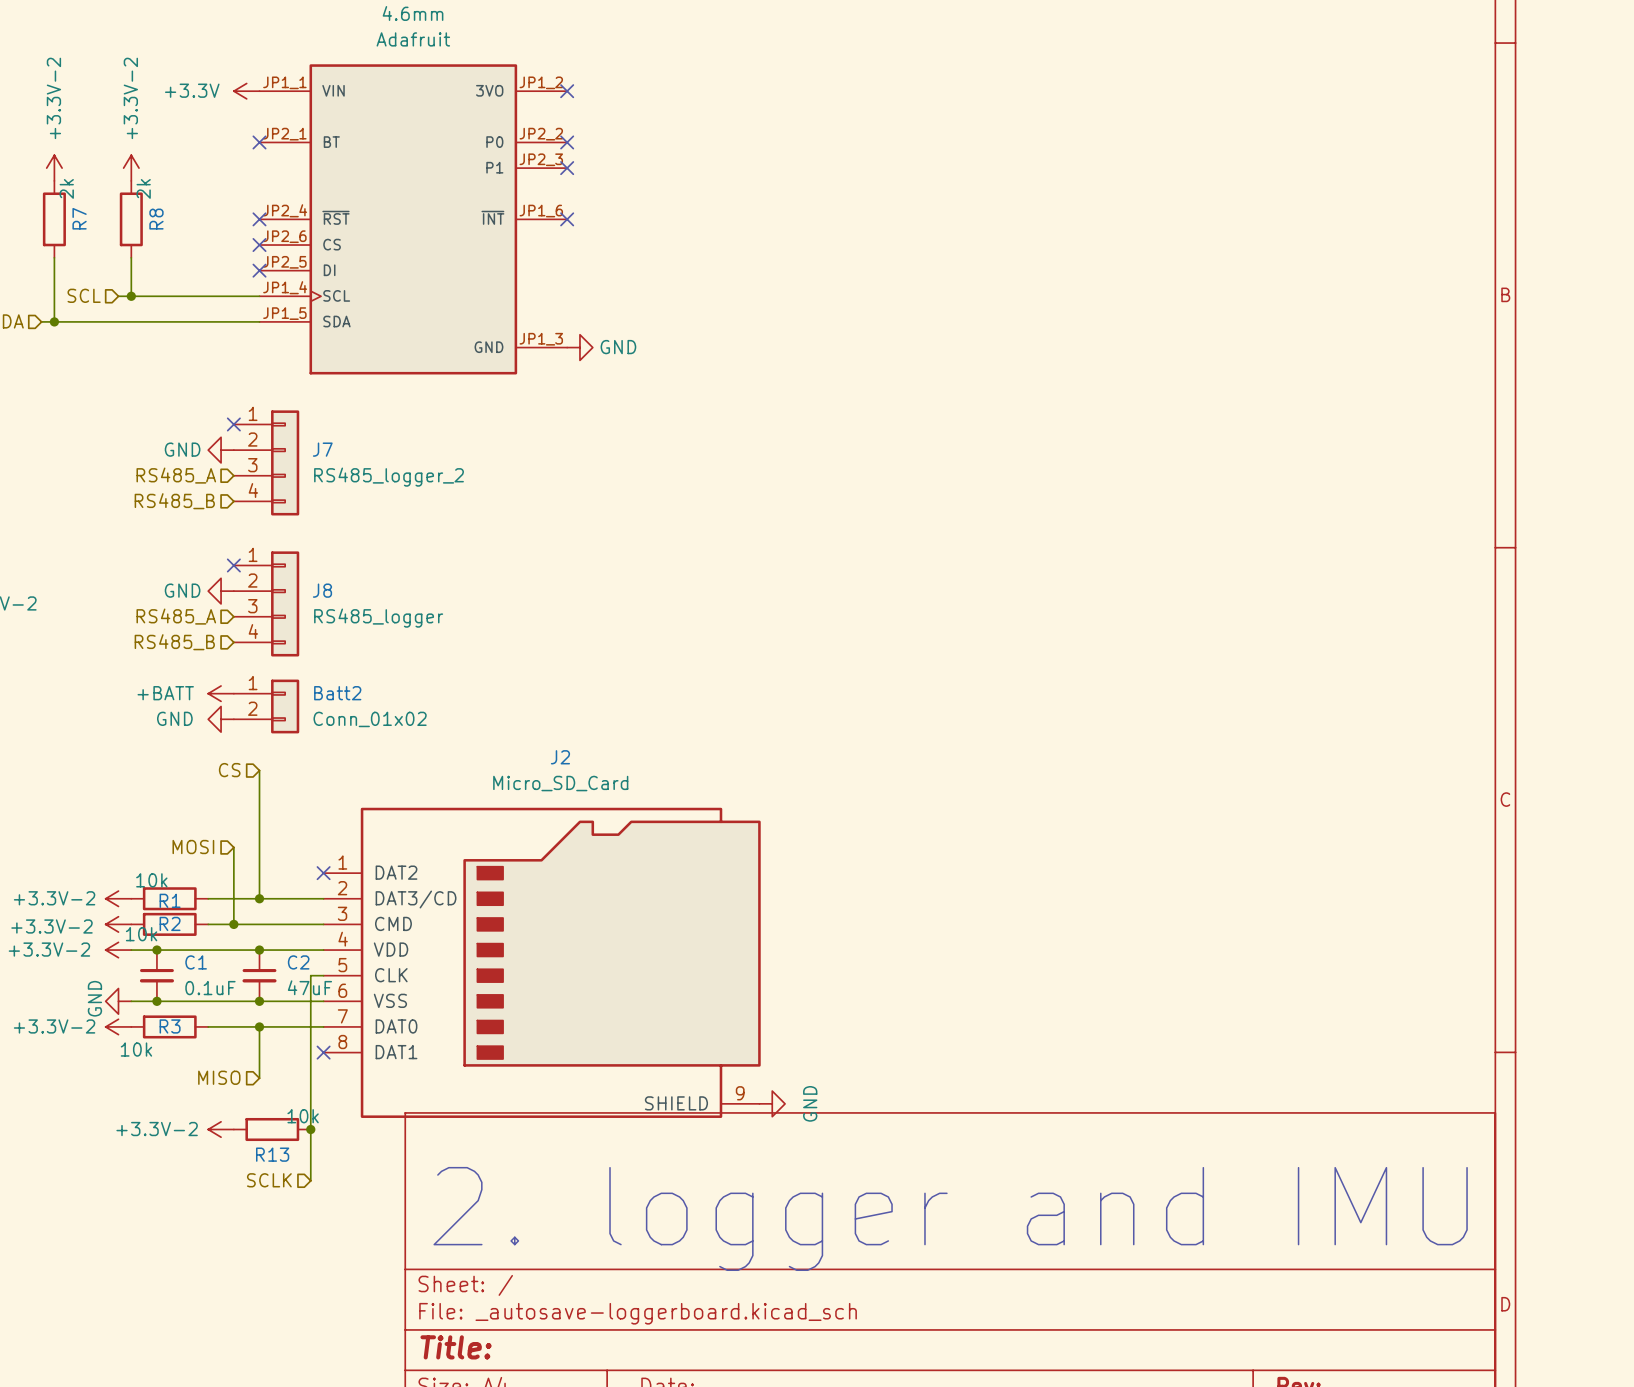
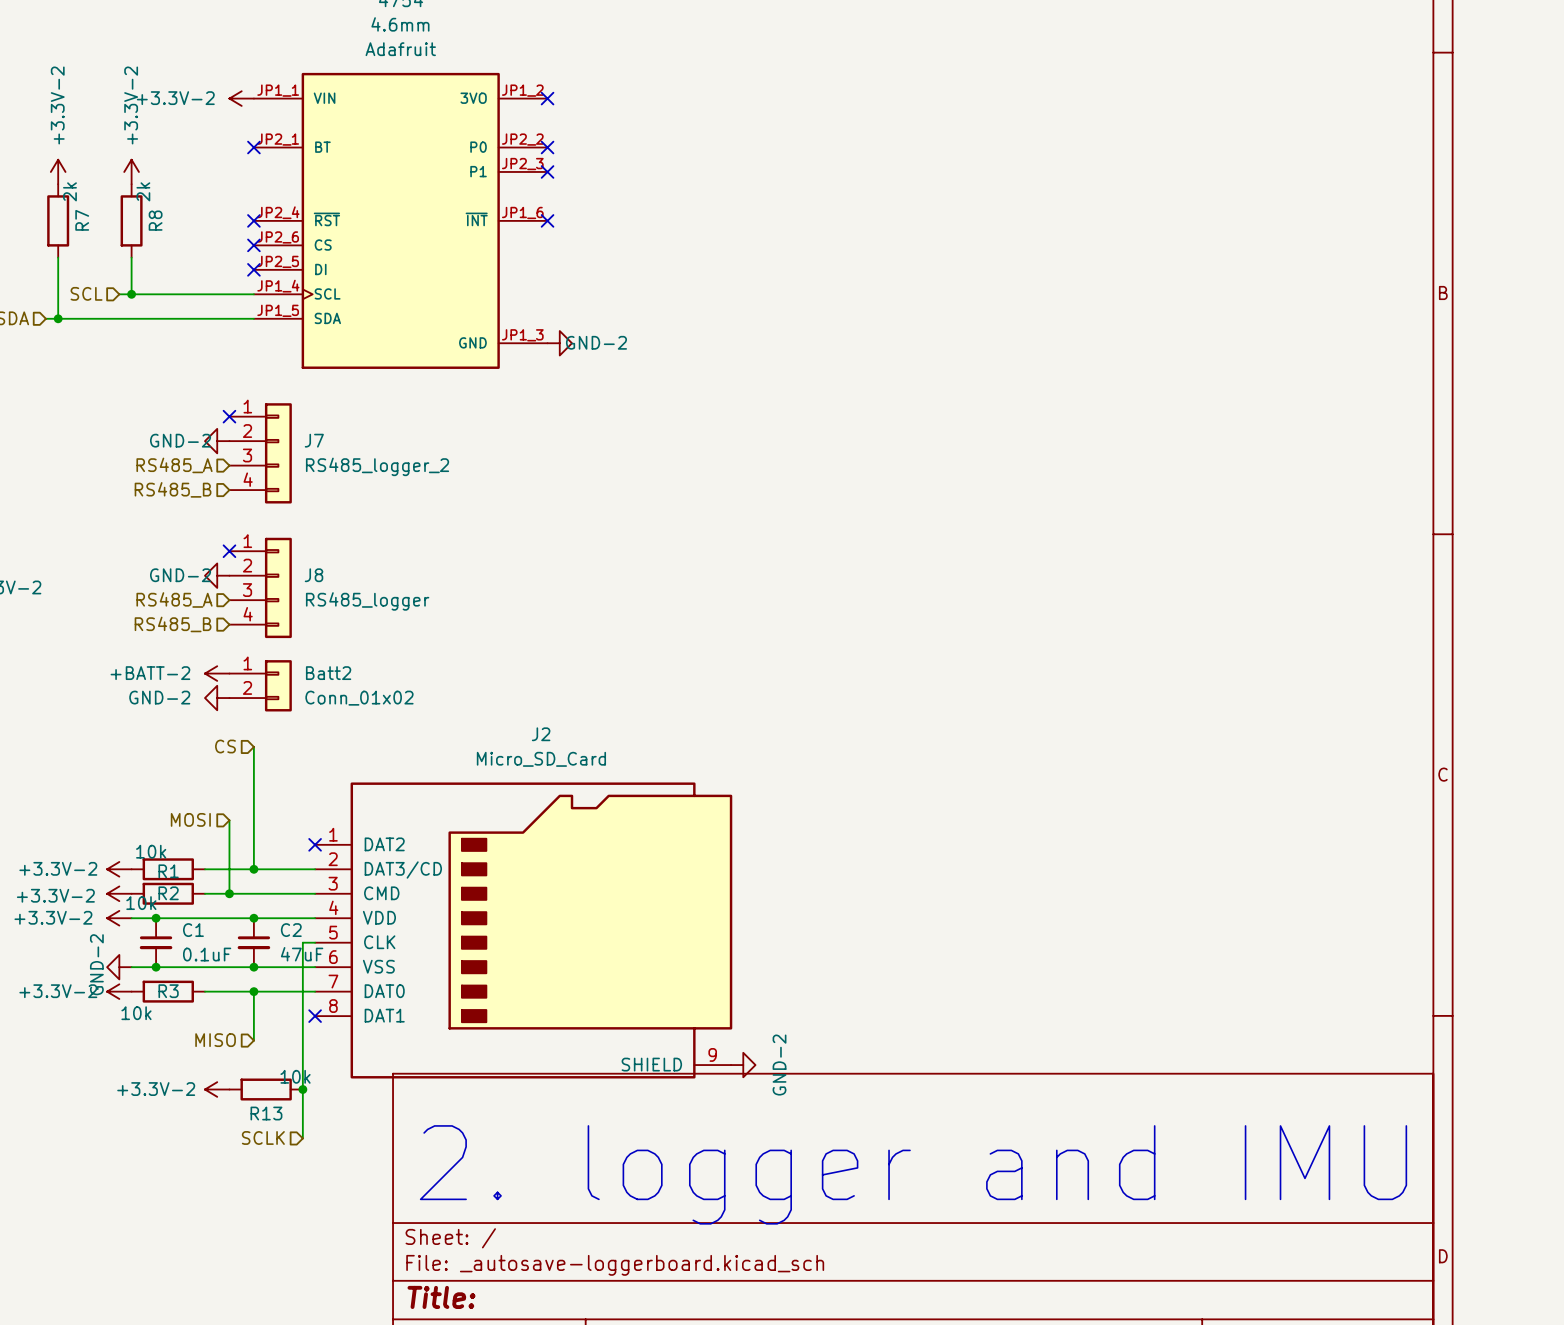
power symbol: +3.3V (246, 91) -> +3.3V-2 (241, 98)
power symbol: GND (579, 347) -> GND-2 (559, 343)
power symbol: GND (221, 450) -> GND-2 (217, 441)
power symbol: GND (221, 591) -> GND-2 (217, 575)
power symbol: +BATT (221, 693) -> +BATT-2 (217, 673)
power symbol: GND (221, 719) -> GND-2 (217, 698)
power symbol: GND (118, 1001) -> GND-2 (119, 967)
power symbol: GND (772, 1103) -> GND-2 (743, 1065)

